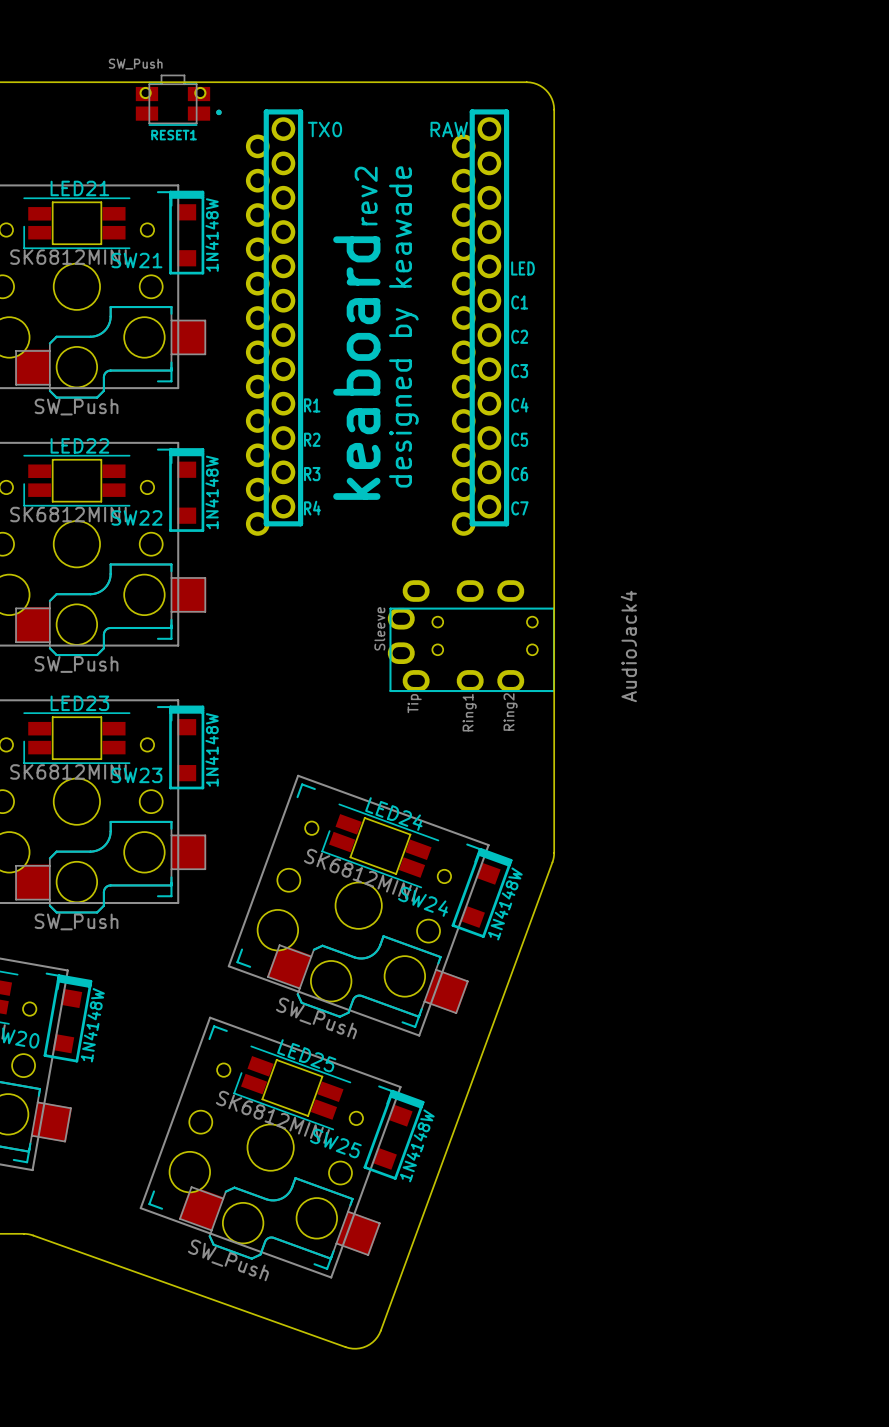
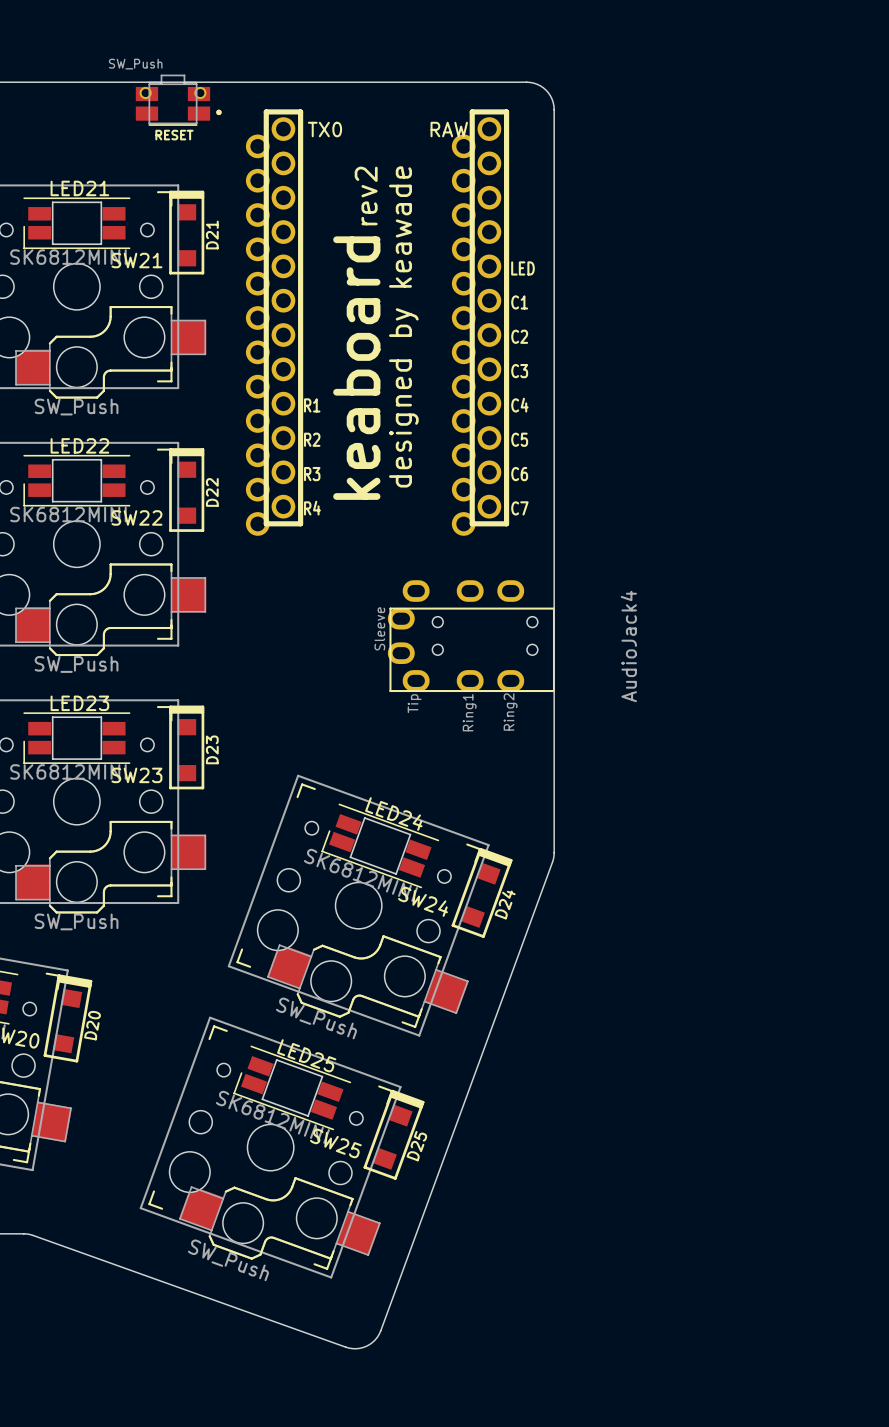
RESET1 name: RESET1 (174, 135) -> RESET (174, 135)
part value: 1N4148W (212, 235) -> D21 (212, 235)
part value: 1N4148W (212, 492) -> D22 (212, 492)
part value: 1N4148W (212, 749) -> D23 (212, 749)
part value: 1N4148W (505, 903) -> D24 (505, 904)
part value: 1N4148W (92, 1025) -> D20 (92, 1025)
part value: 1N4148W (417, 1145) -> D25 (416, 1146)

